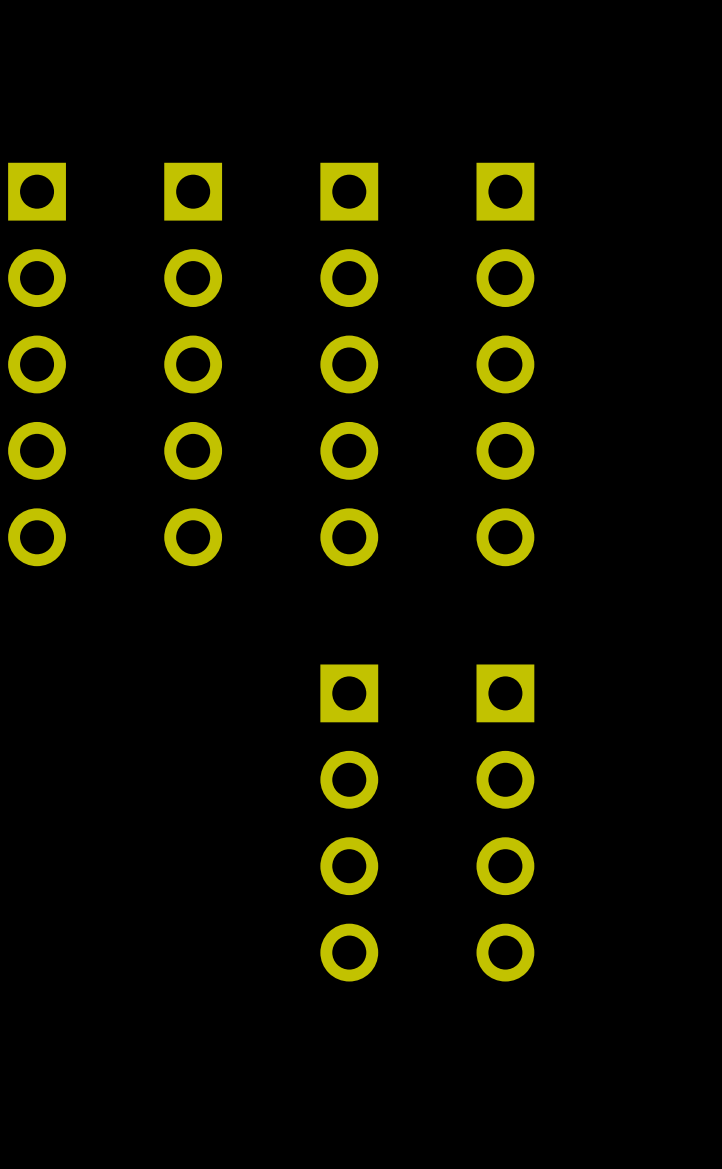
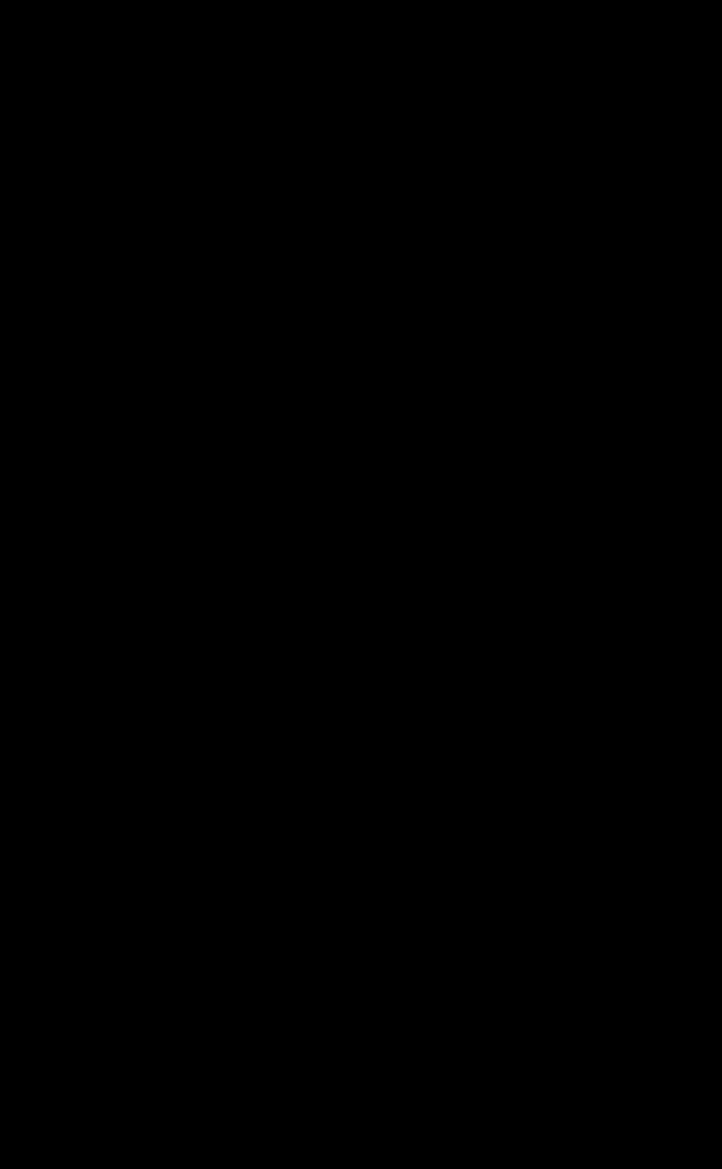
part: (37, 364) -> none
part: (193, 364) -> none
part: (349, 364) -> none
part: (505, 364) -> none
part: (349, 822) -> none
part: (505, 822) -> none

